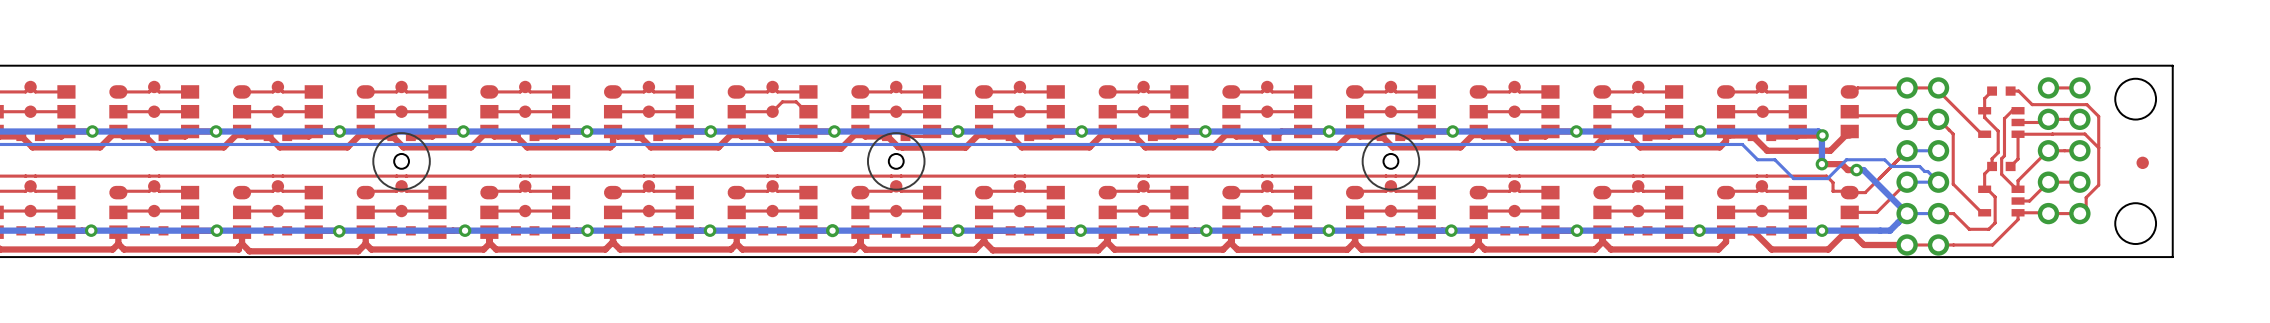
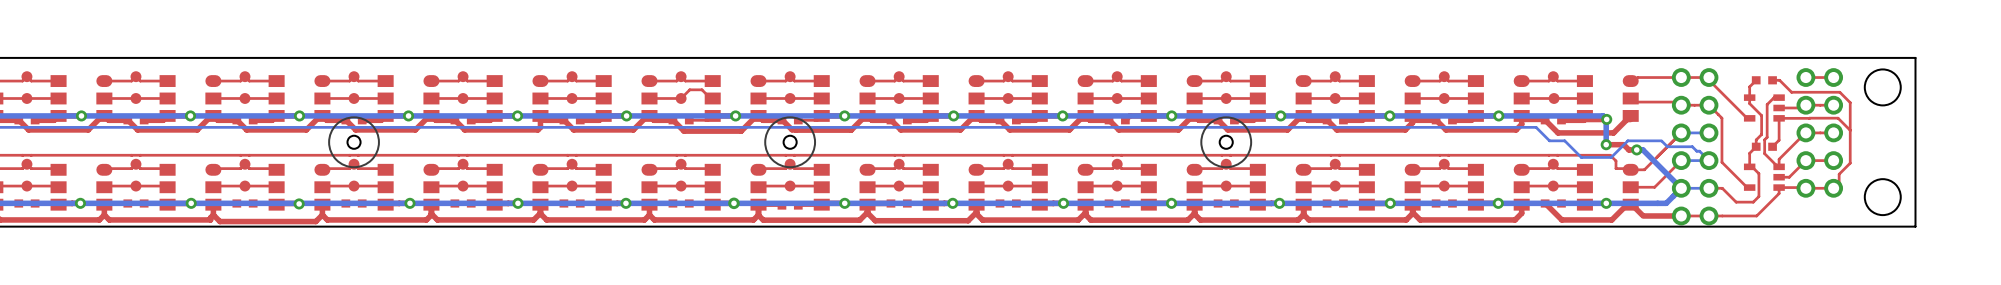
part: (2142, 162) -> none

